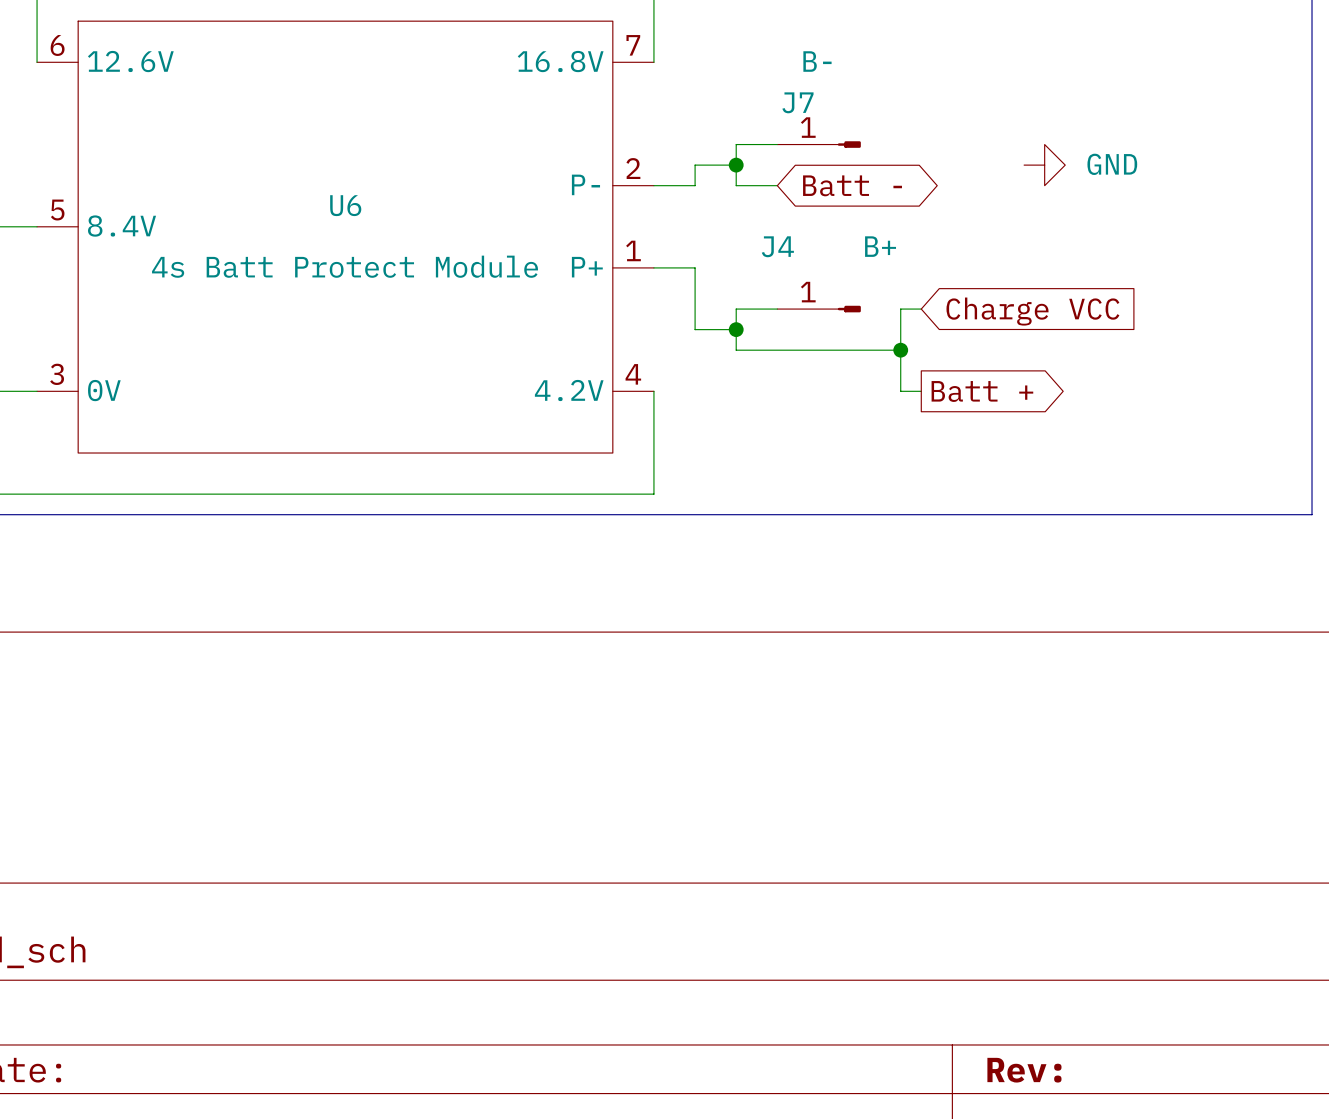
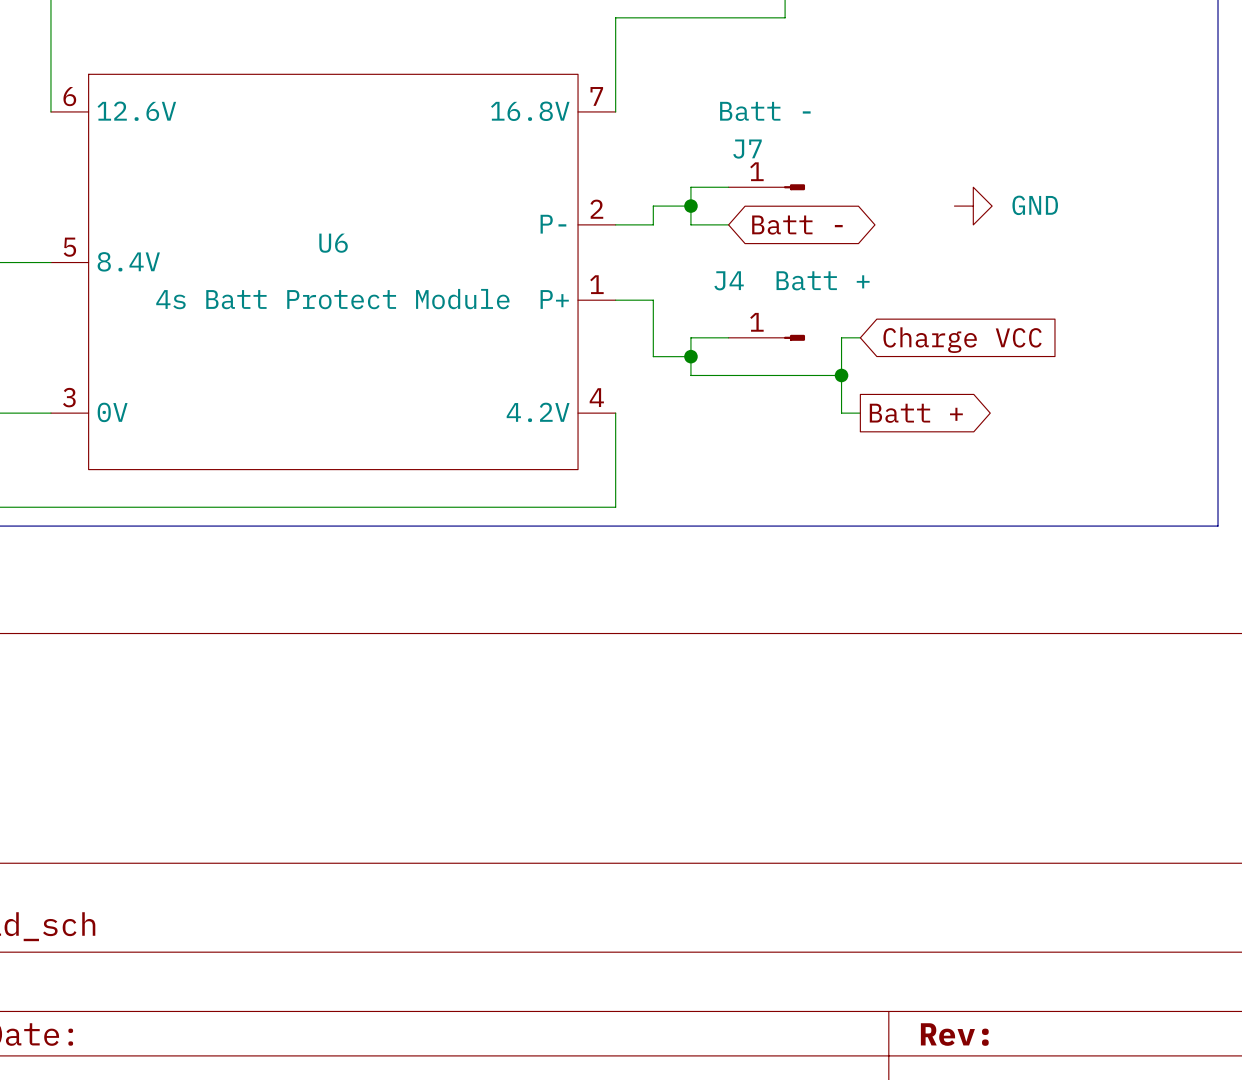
J7 value: B- (817, 61) -> Batt - (765, 111)
J4 value: B+ (880, 246) -> Batt + (823, 280)

